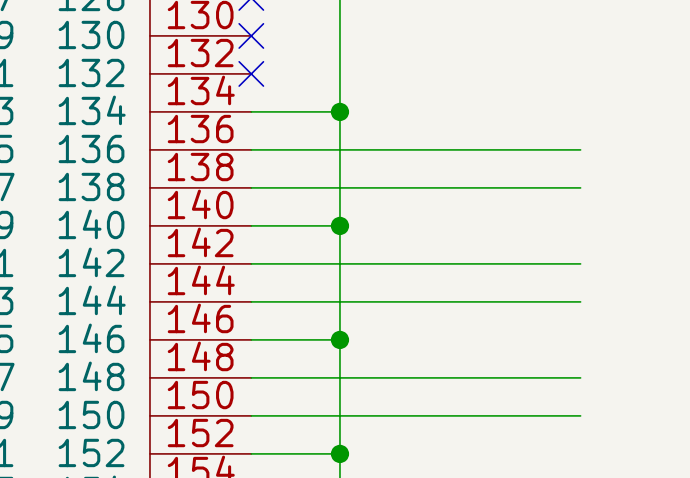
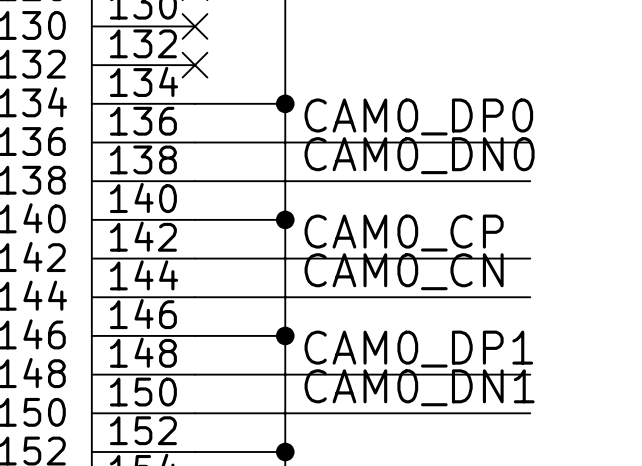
label: none -> CAM0_DP0 (418, 116)
label: none -> CAM0_DN0 (419, 155)
label: none -> CAM0_CP (404, 233)
label: none -> CAM0_CN (404, 271)
label: none -> CAM0_DP1 (418, 349)
label: none -> CAM0_DN1 (419, 387)

